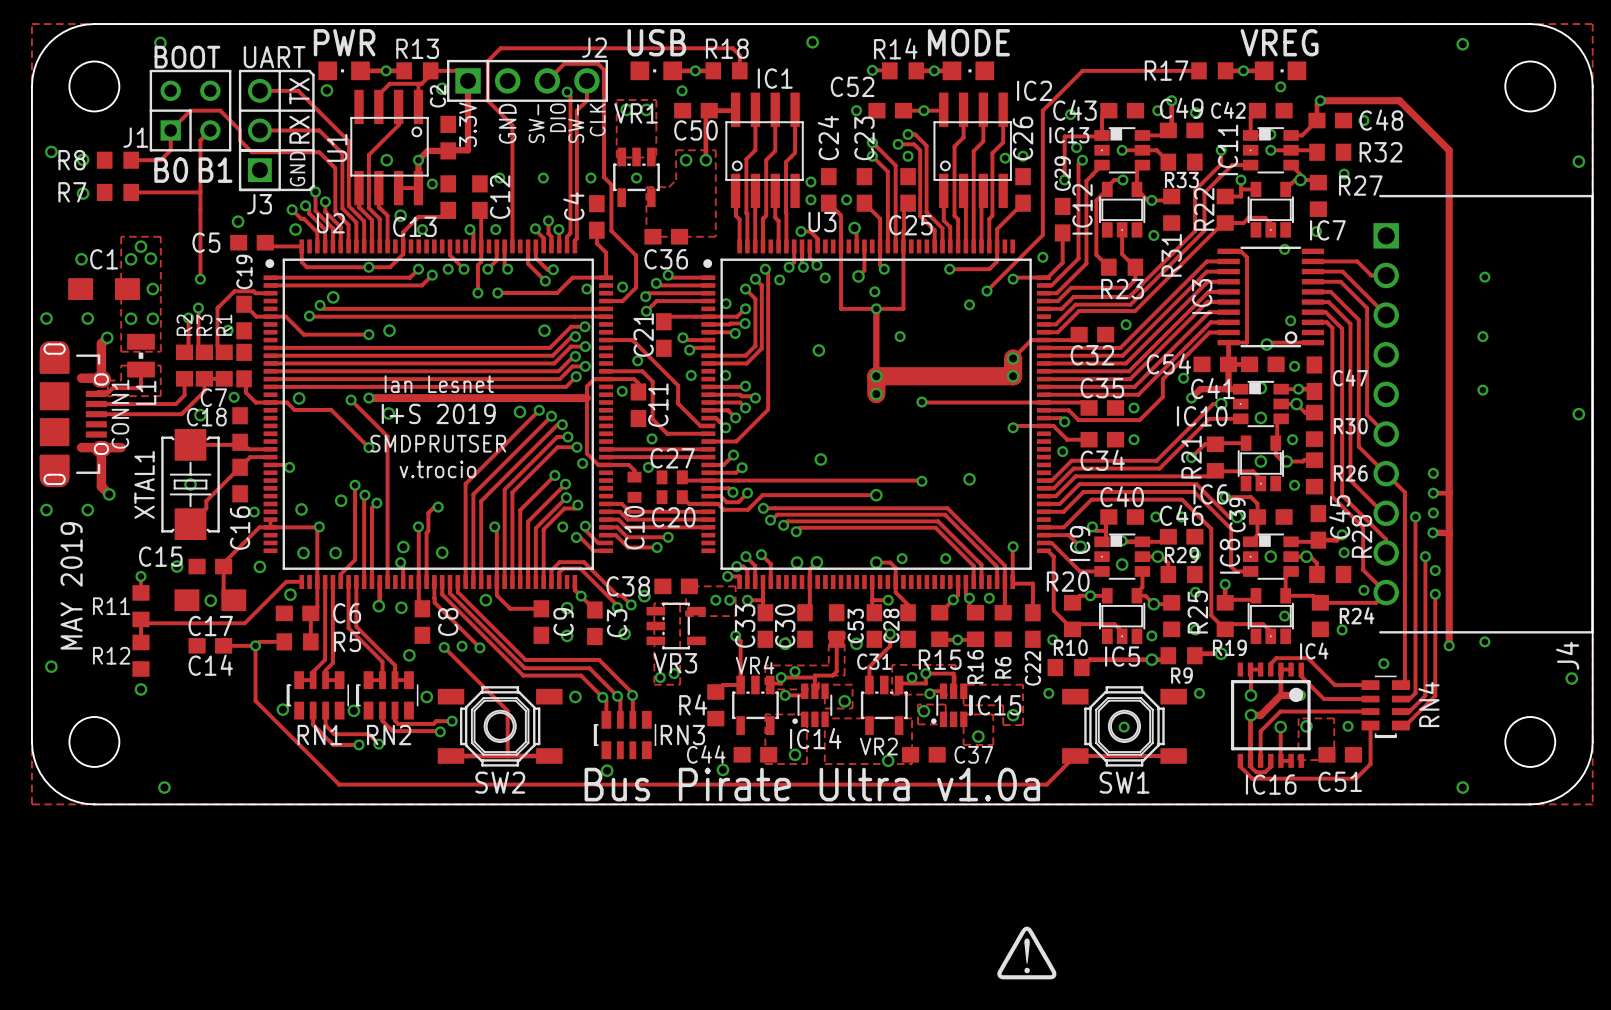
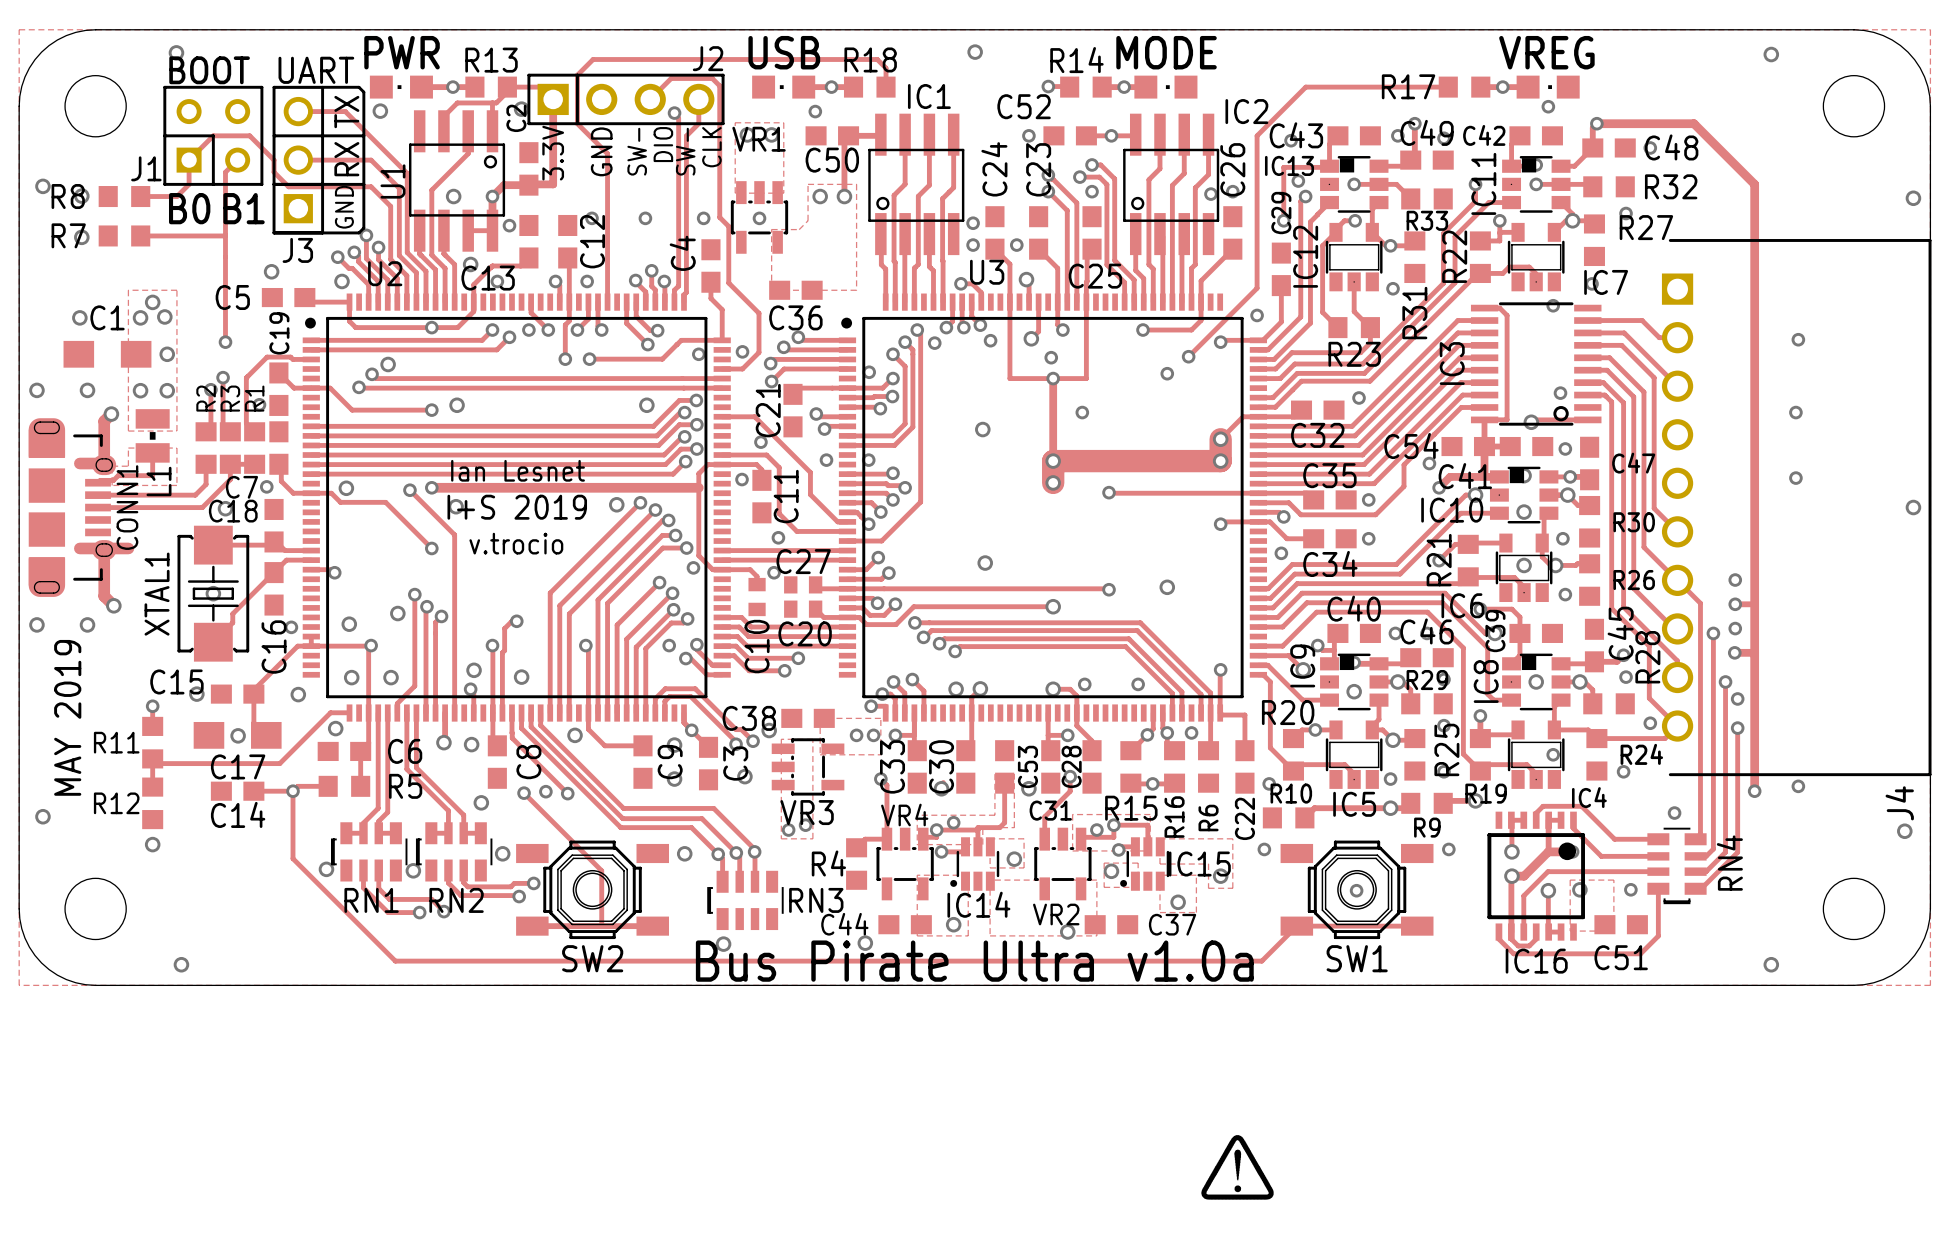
text: SMDPRUTSER (438, 443) -> v.trocio (516, 543)
text: v.trocio (437, 469) -> none

